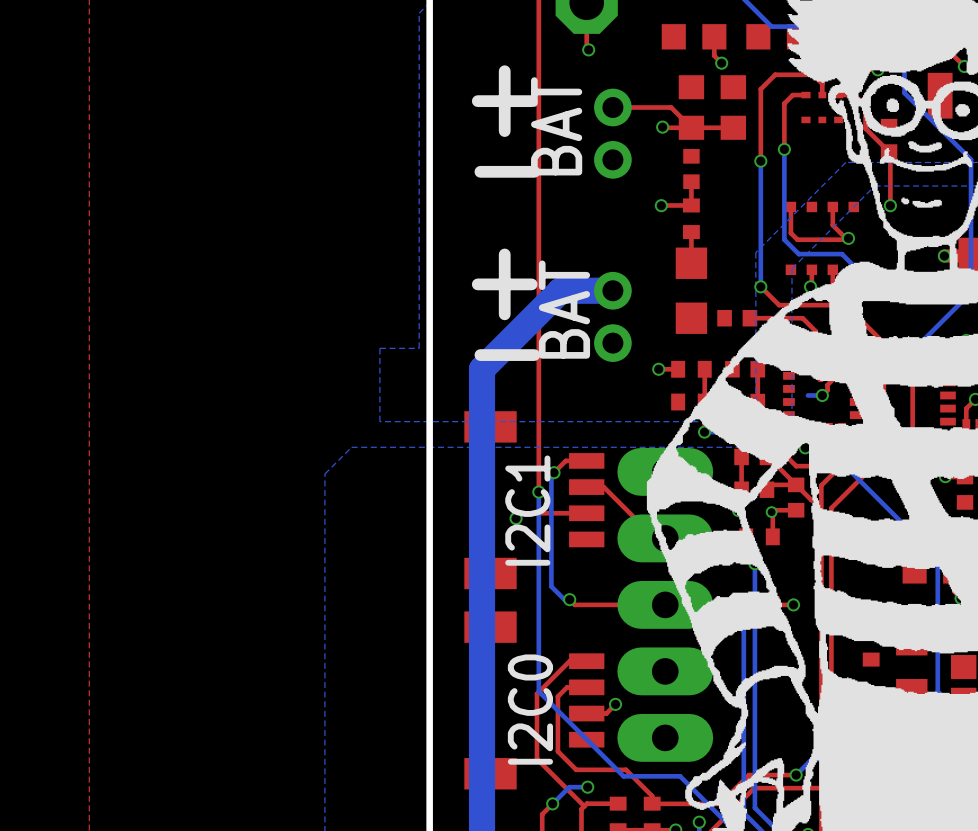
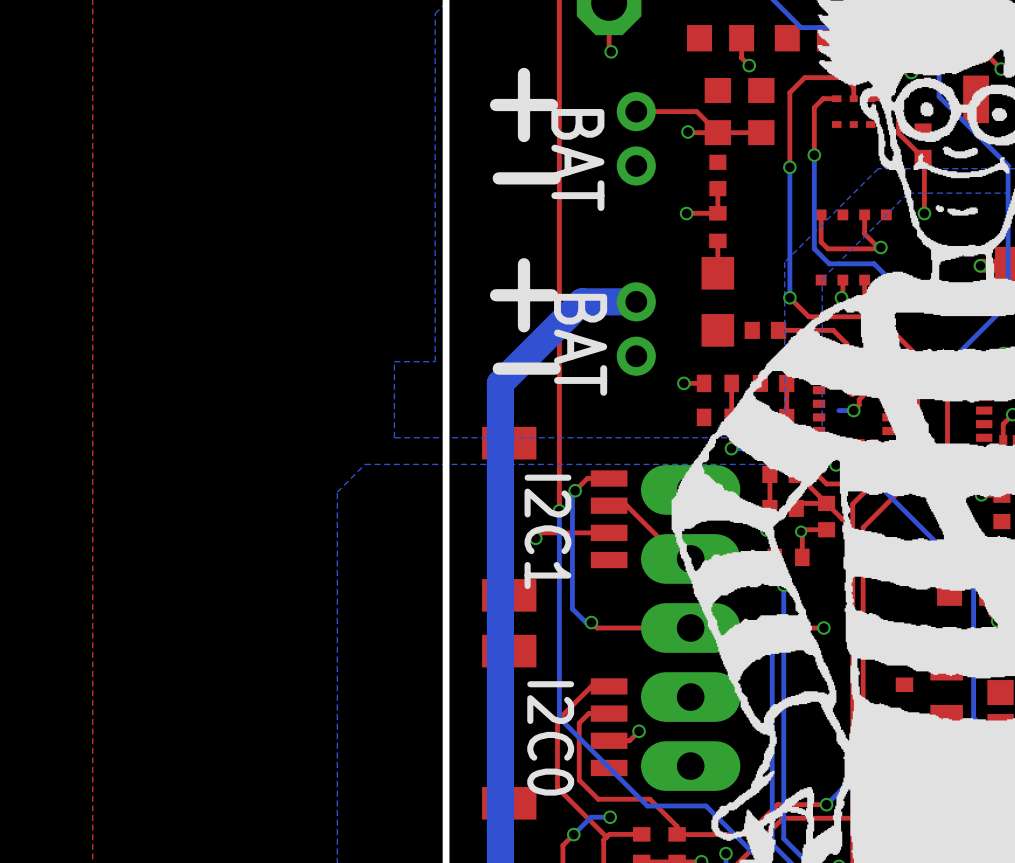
text rotation: 0° (556, 126) -> 180° (577, 160)
text rotation: 0° (564, 309) -> 180° (580, 344)
text rotation: 0° (527, 510) -> 180° (547, 531)
text rotation: 0° (530, 709) -> 180° (550, 738)

